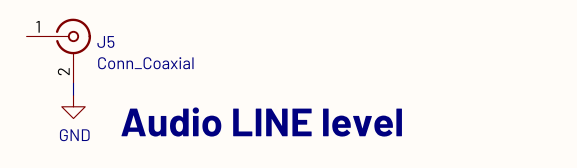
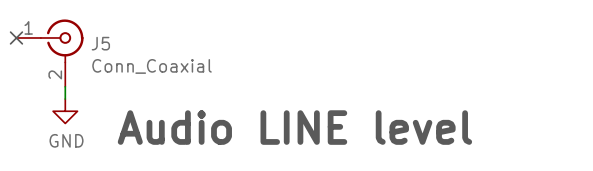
no-connect mark: none -> (16, 37)

